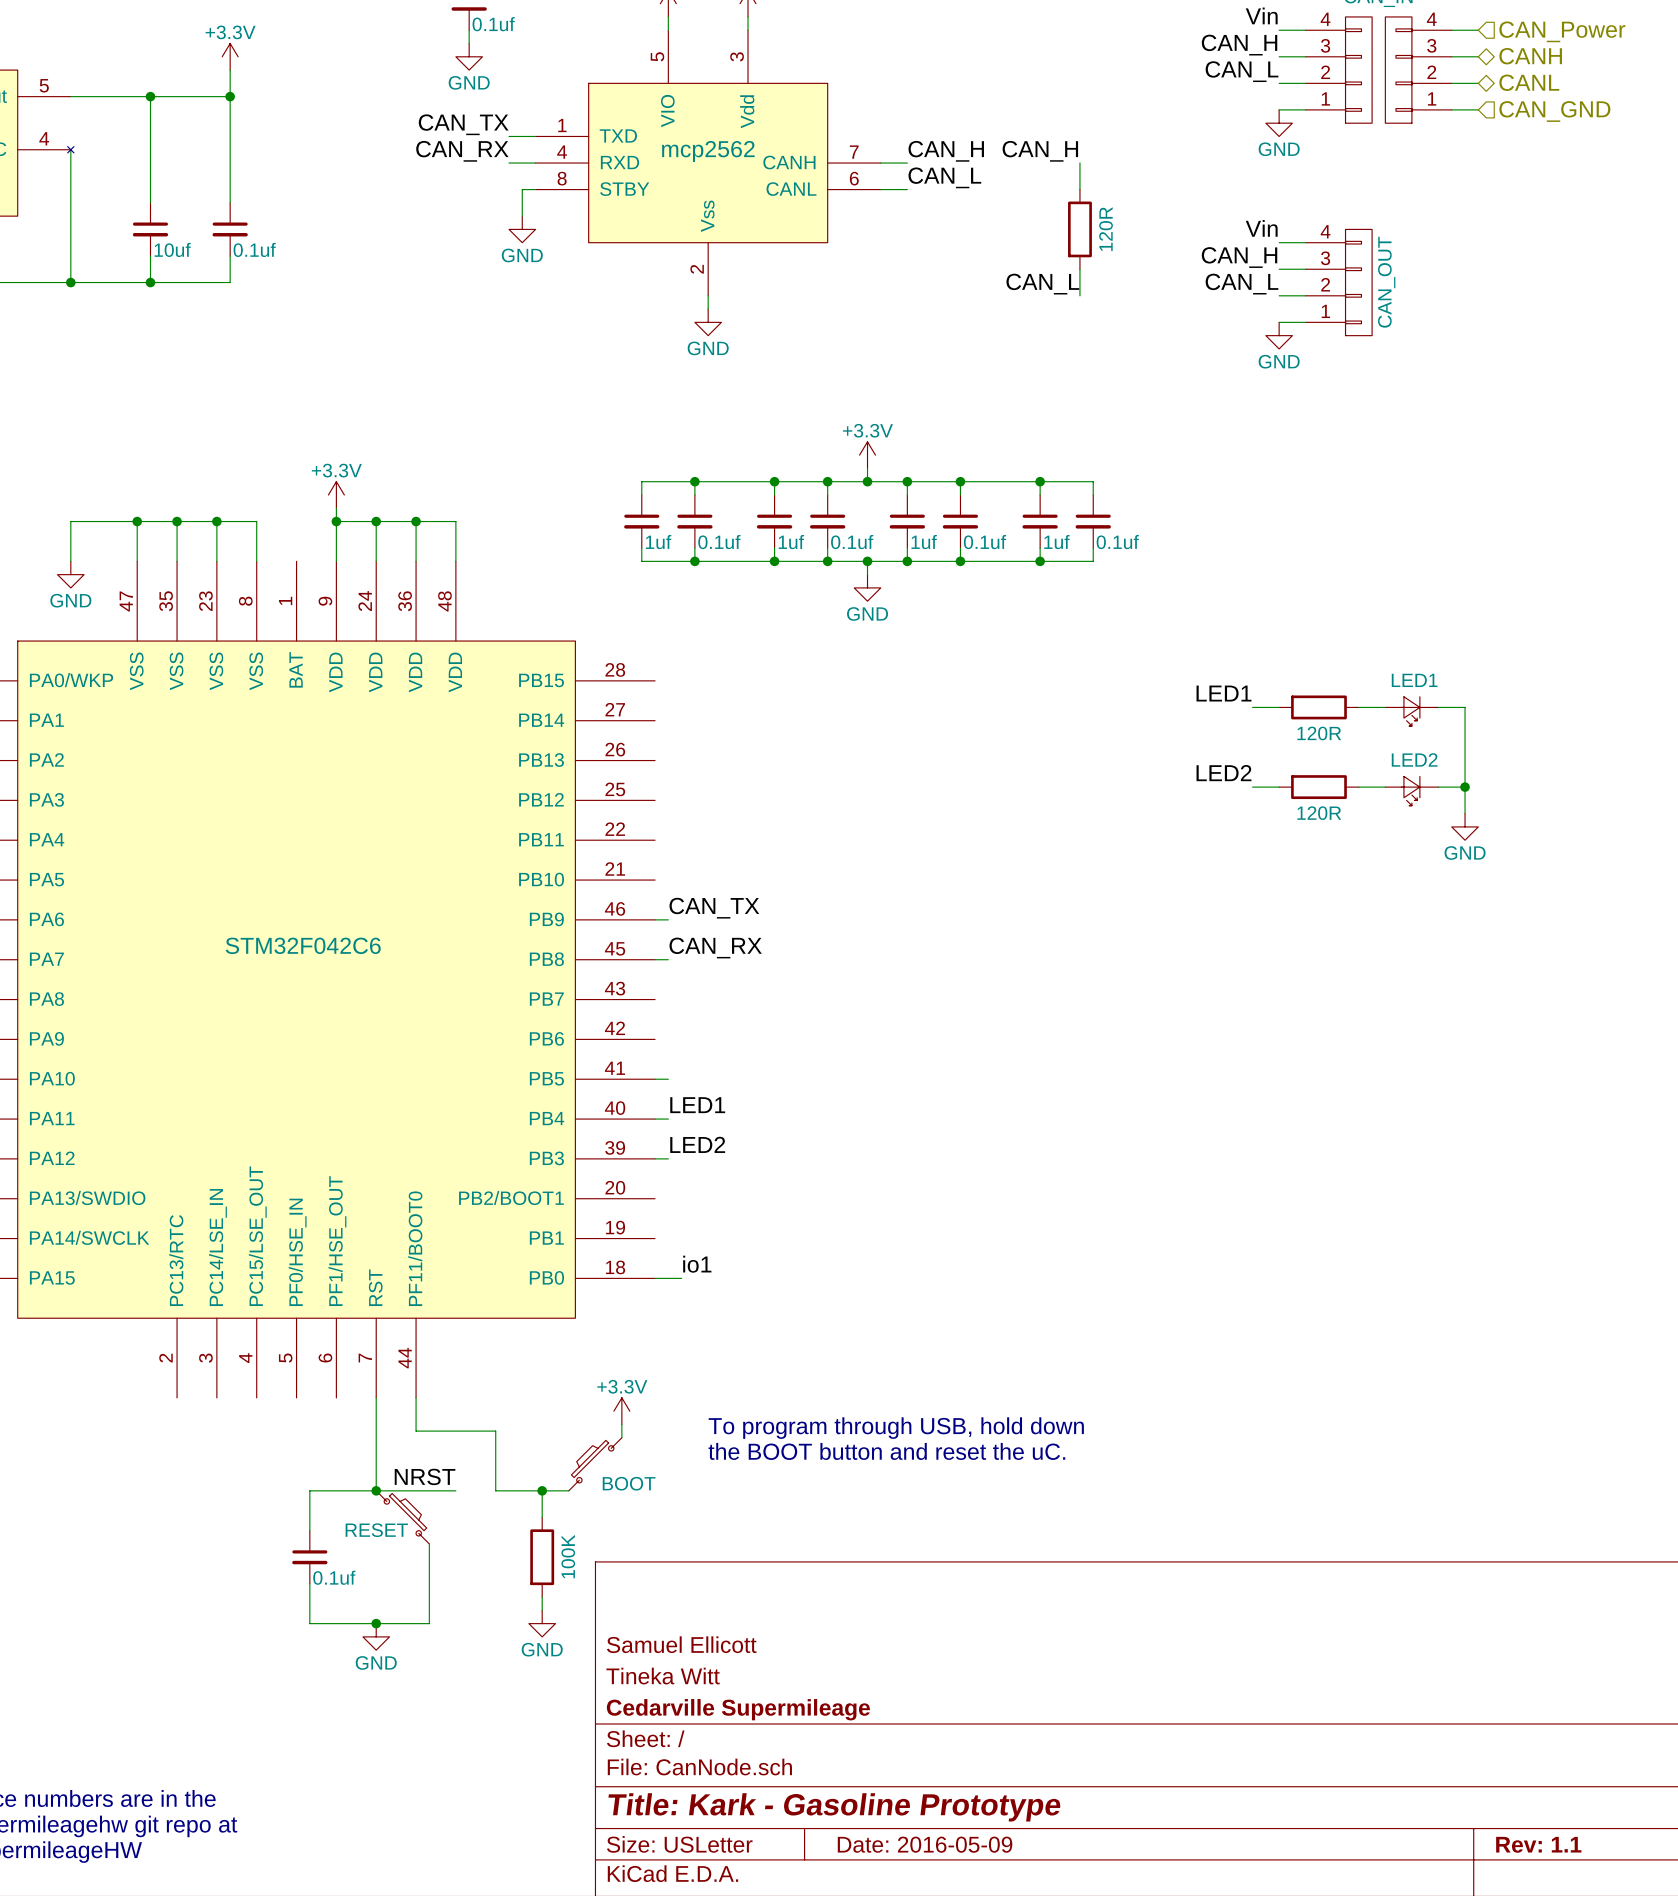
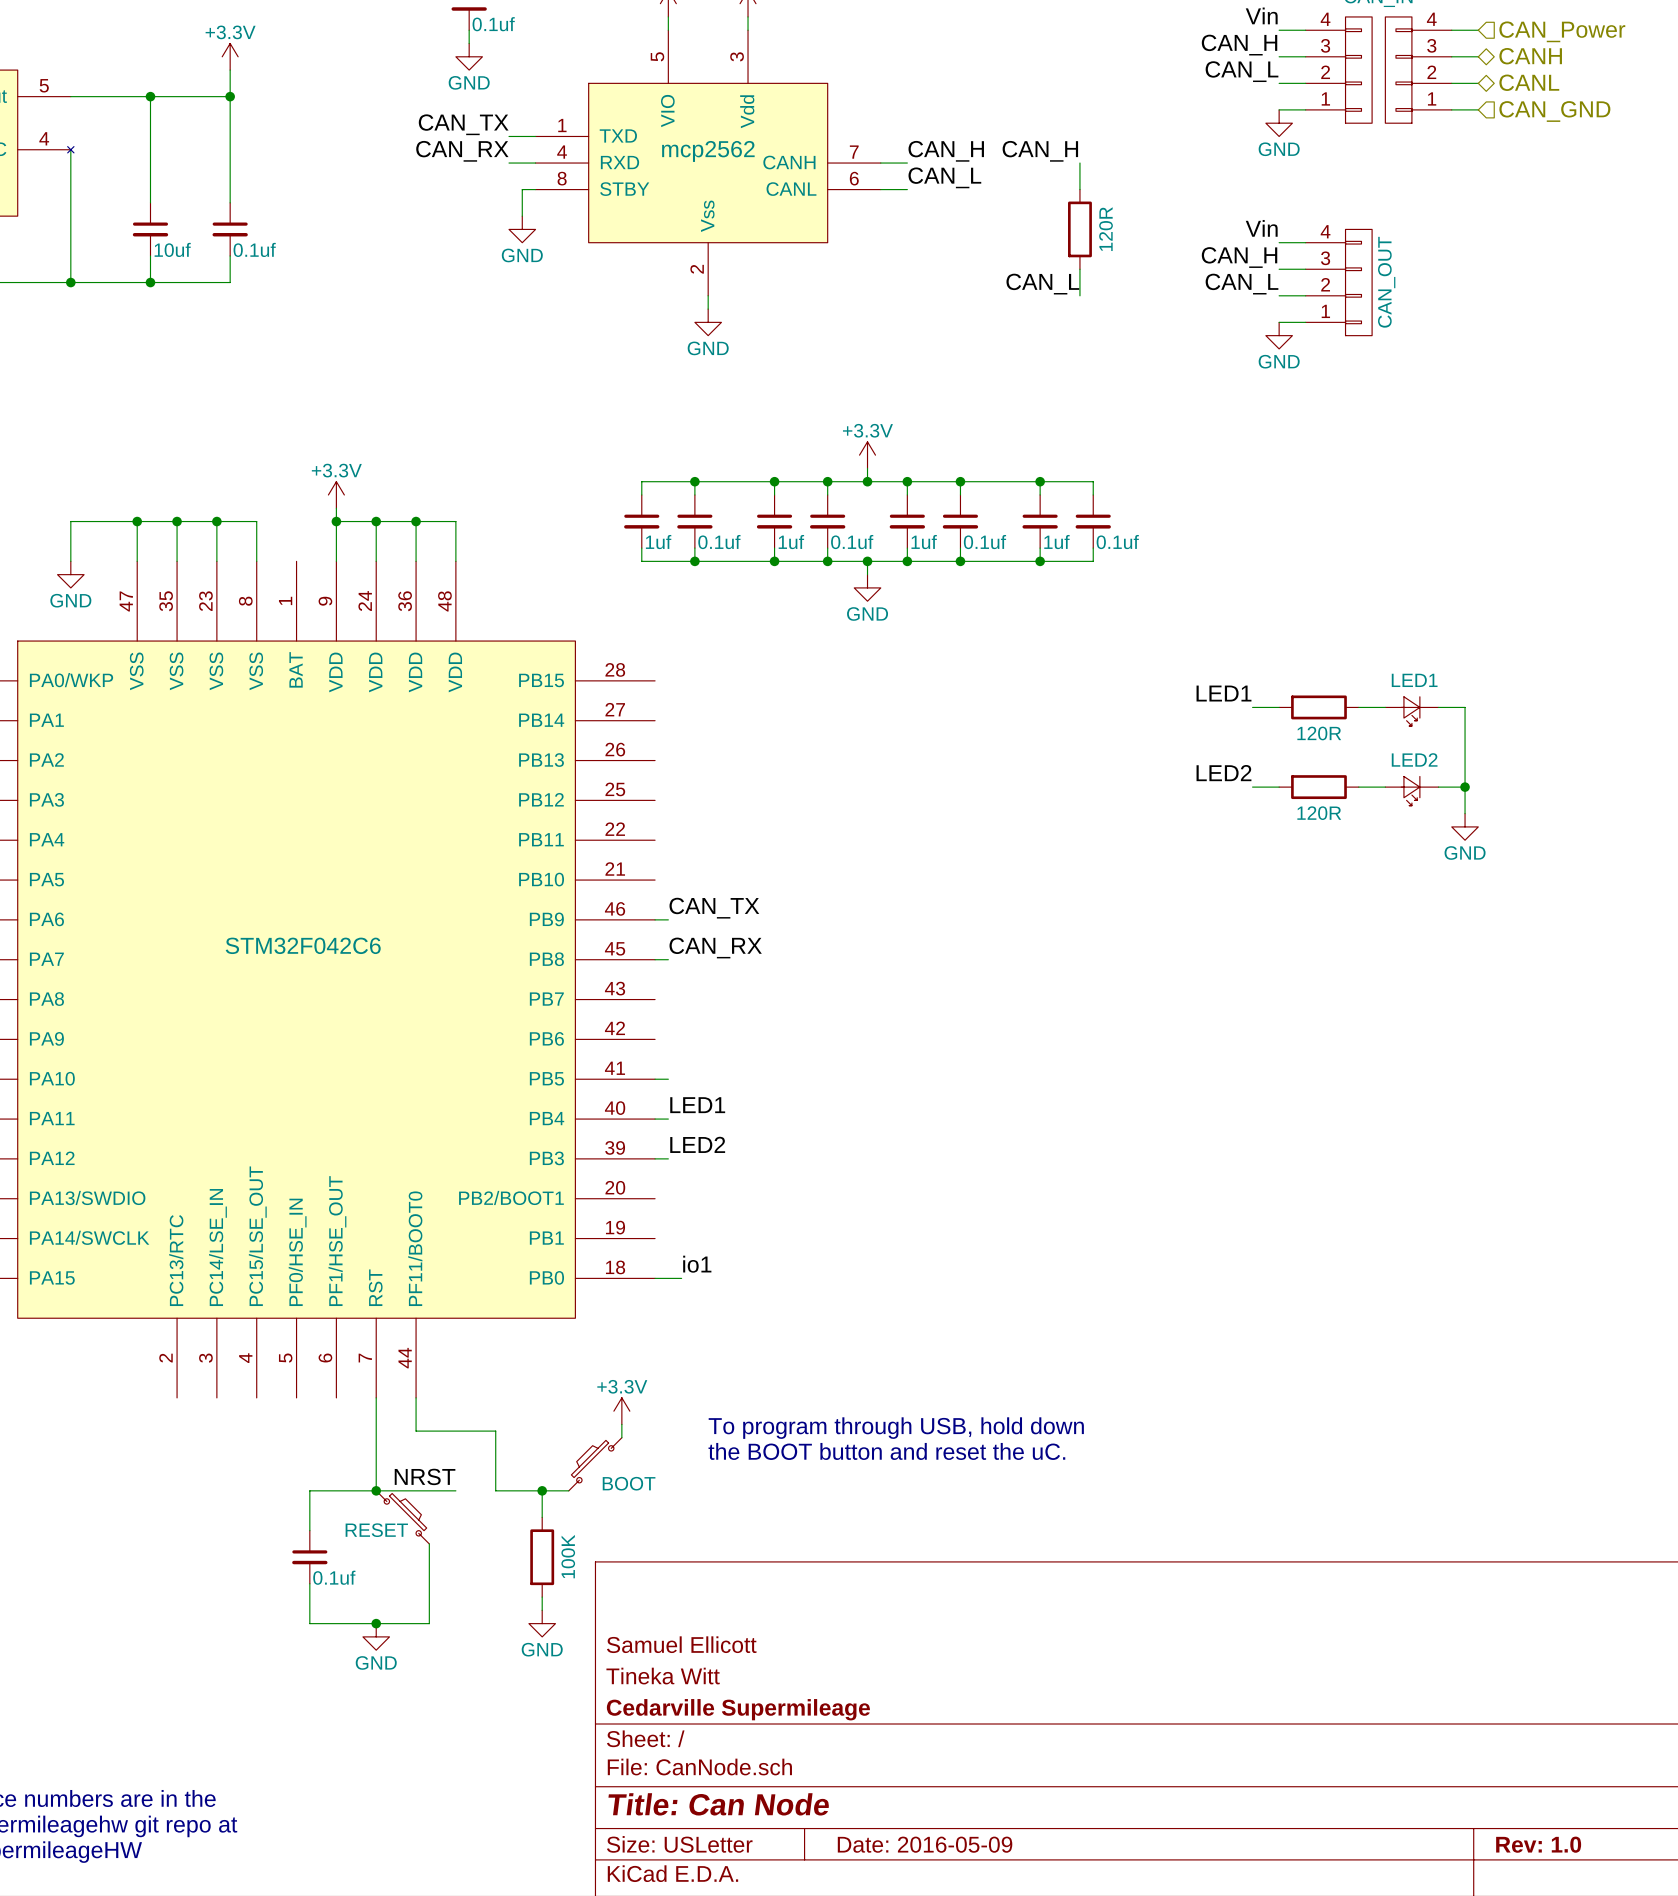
title block: Title: Kark - Gasoline Prototype (834, 1807) -> Title: Can Node (718, 1804)
title block: Rev: 1.1 (1538, 1844) -> Rev: 1.0 (1538, 1844)

